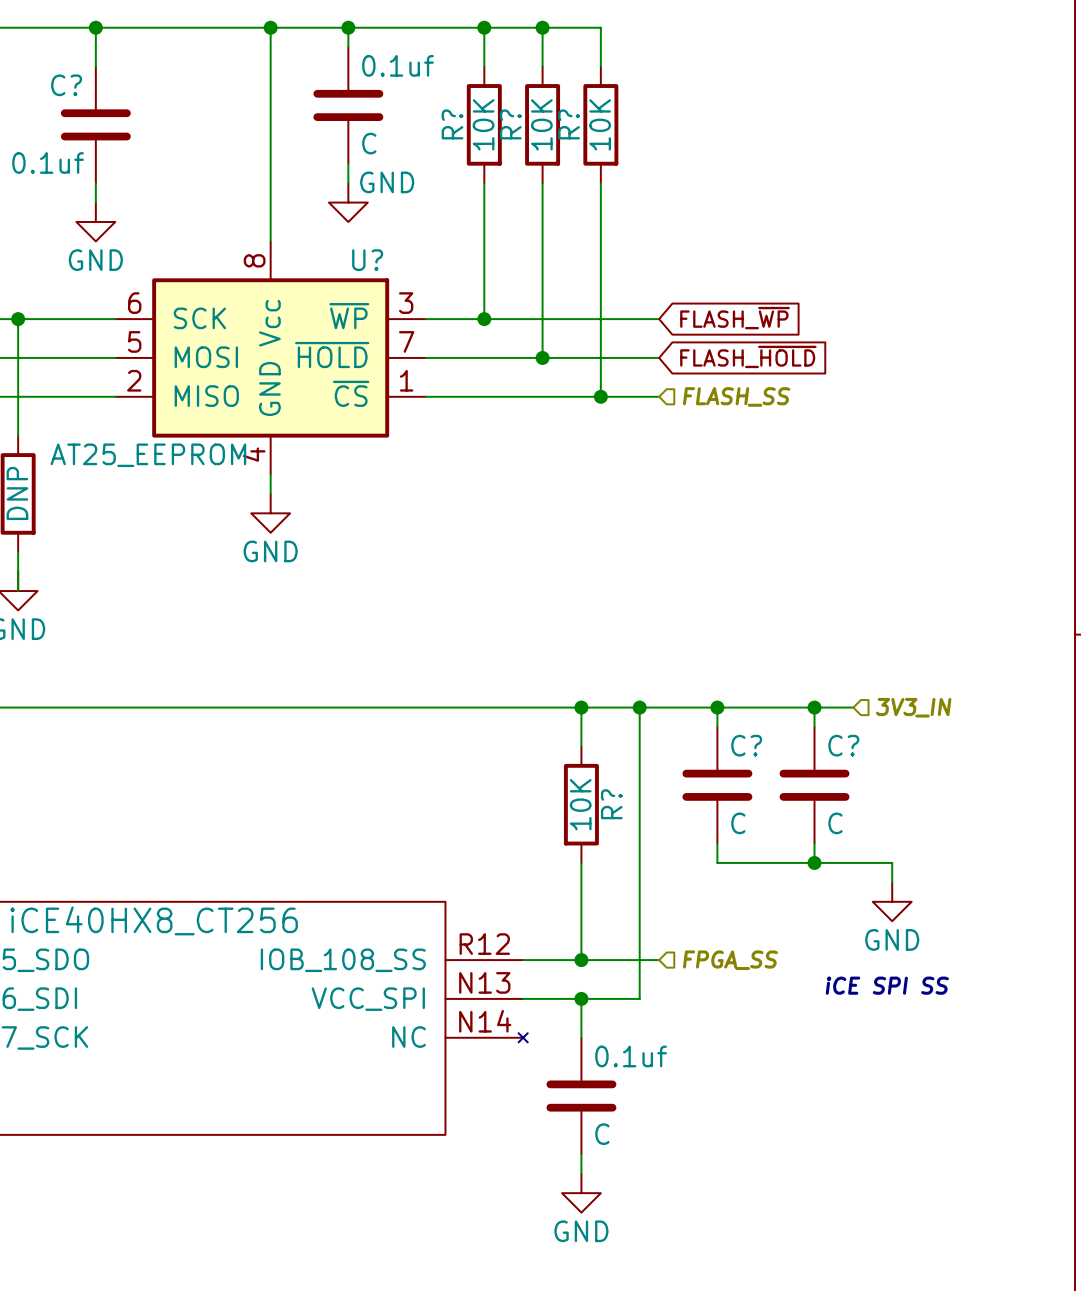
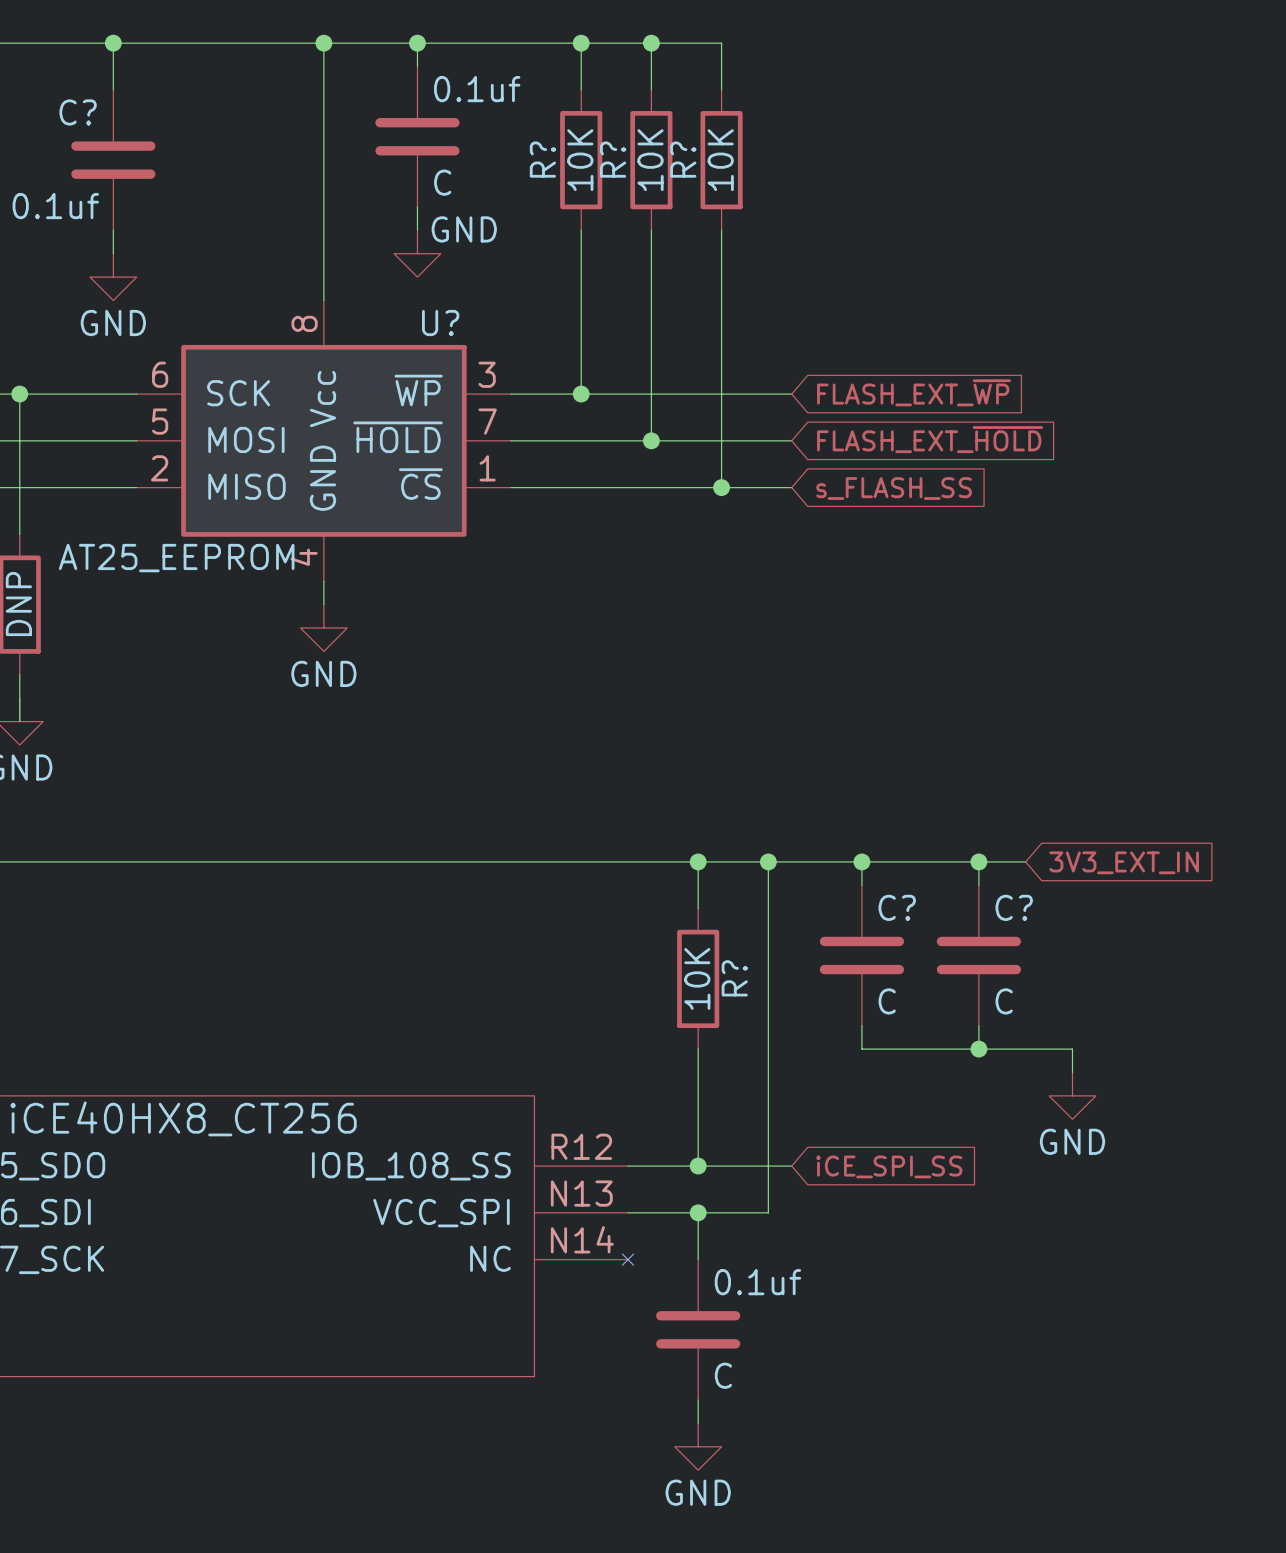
global label: FLASH_~{WP} (735, 318) -> FLASH_EXT_~{WP} (914, 392)
global label: FLASH_~{HOLD} (748, 356) -> FLASH_EXT_~{HOLD} (930, 439)
hierarchical label: FLASH_SS (736, 396) -> none
global label: none -> s_FLASH_SS (894, 488)
hierarchical label: 3V3_IN (913, 707) -> none
global label: none -> 3V3_EXT_IN (1124, 862)
hierarchical label: FPGA_SS (730, 960) -> none
global label: none -> iCE_SPI_SS (889, 1166)
text: iCE SPI SS (887, 985) -> none

